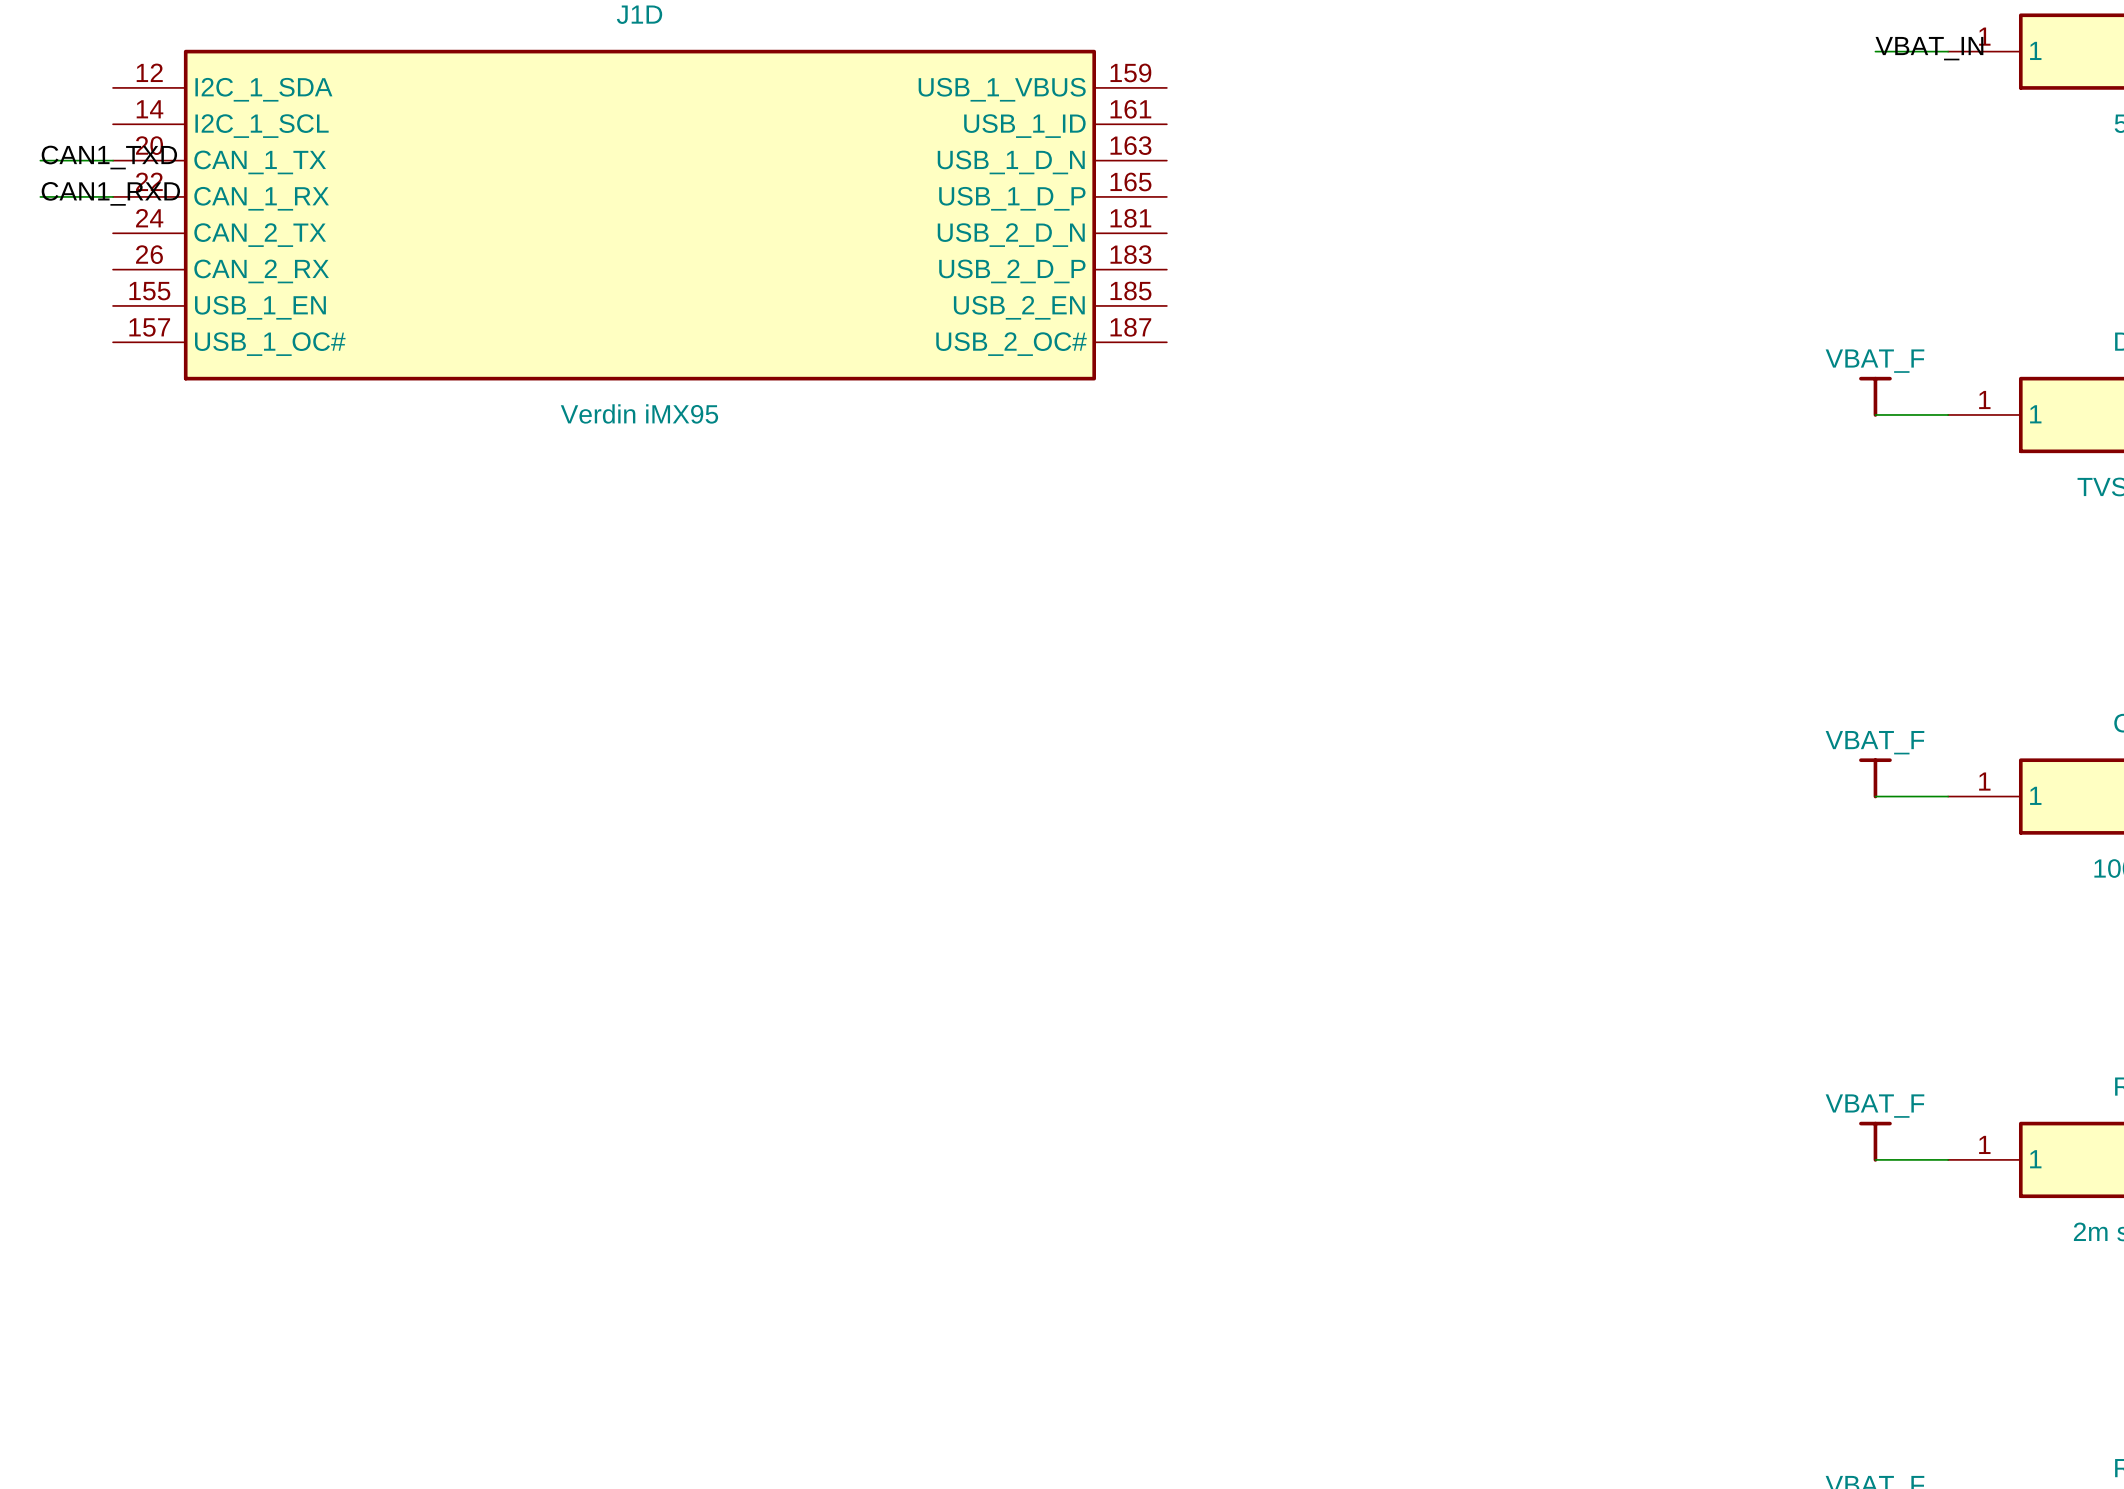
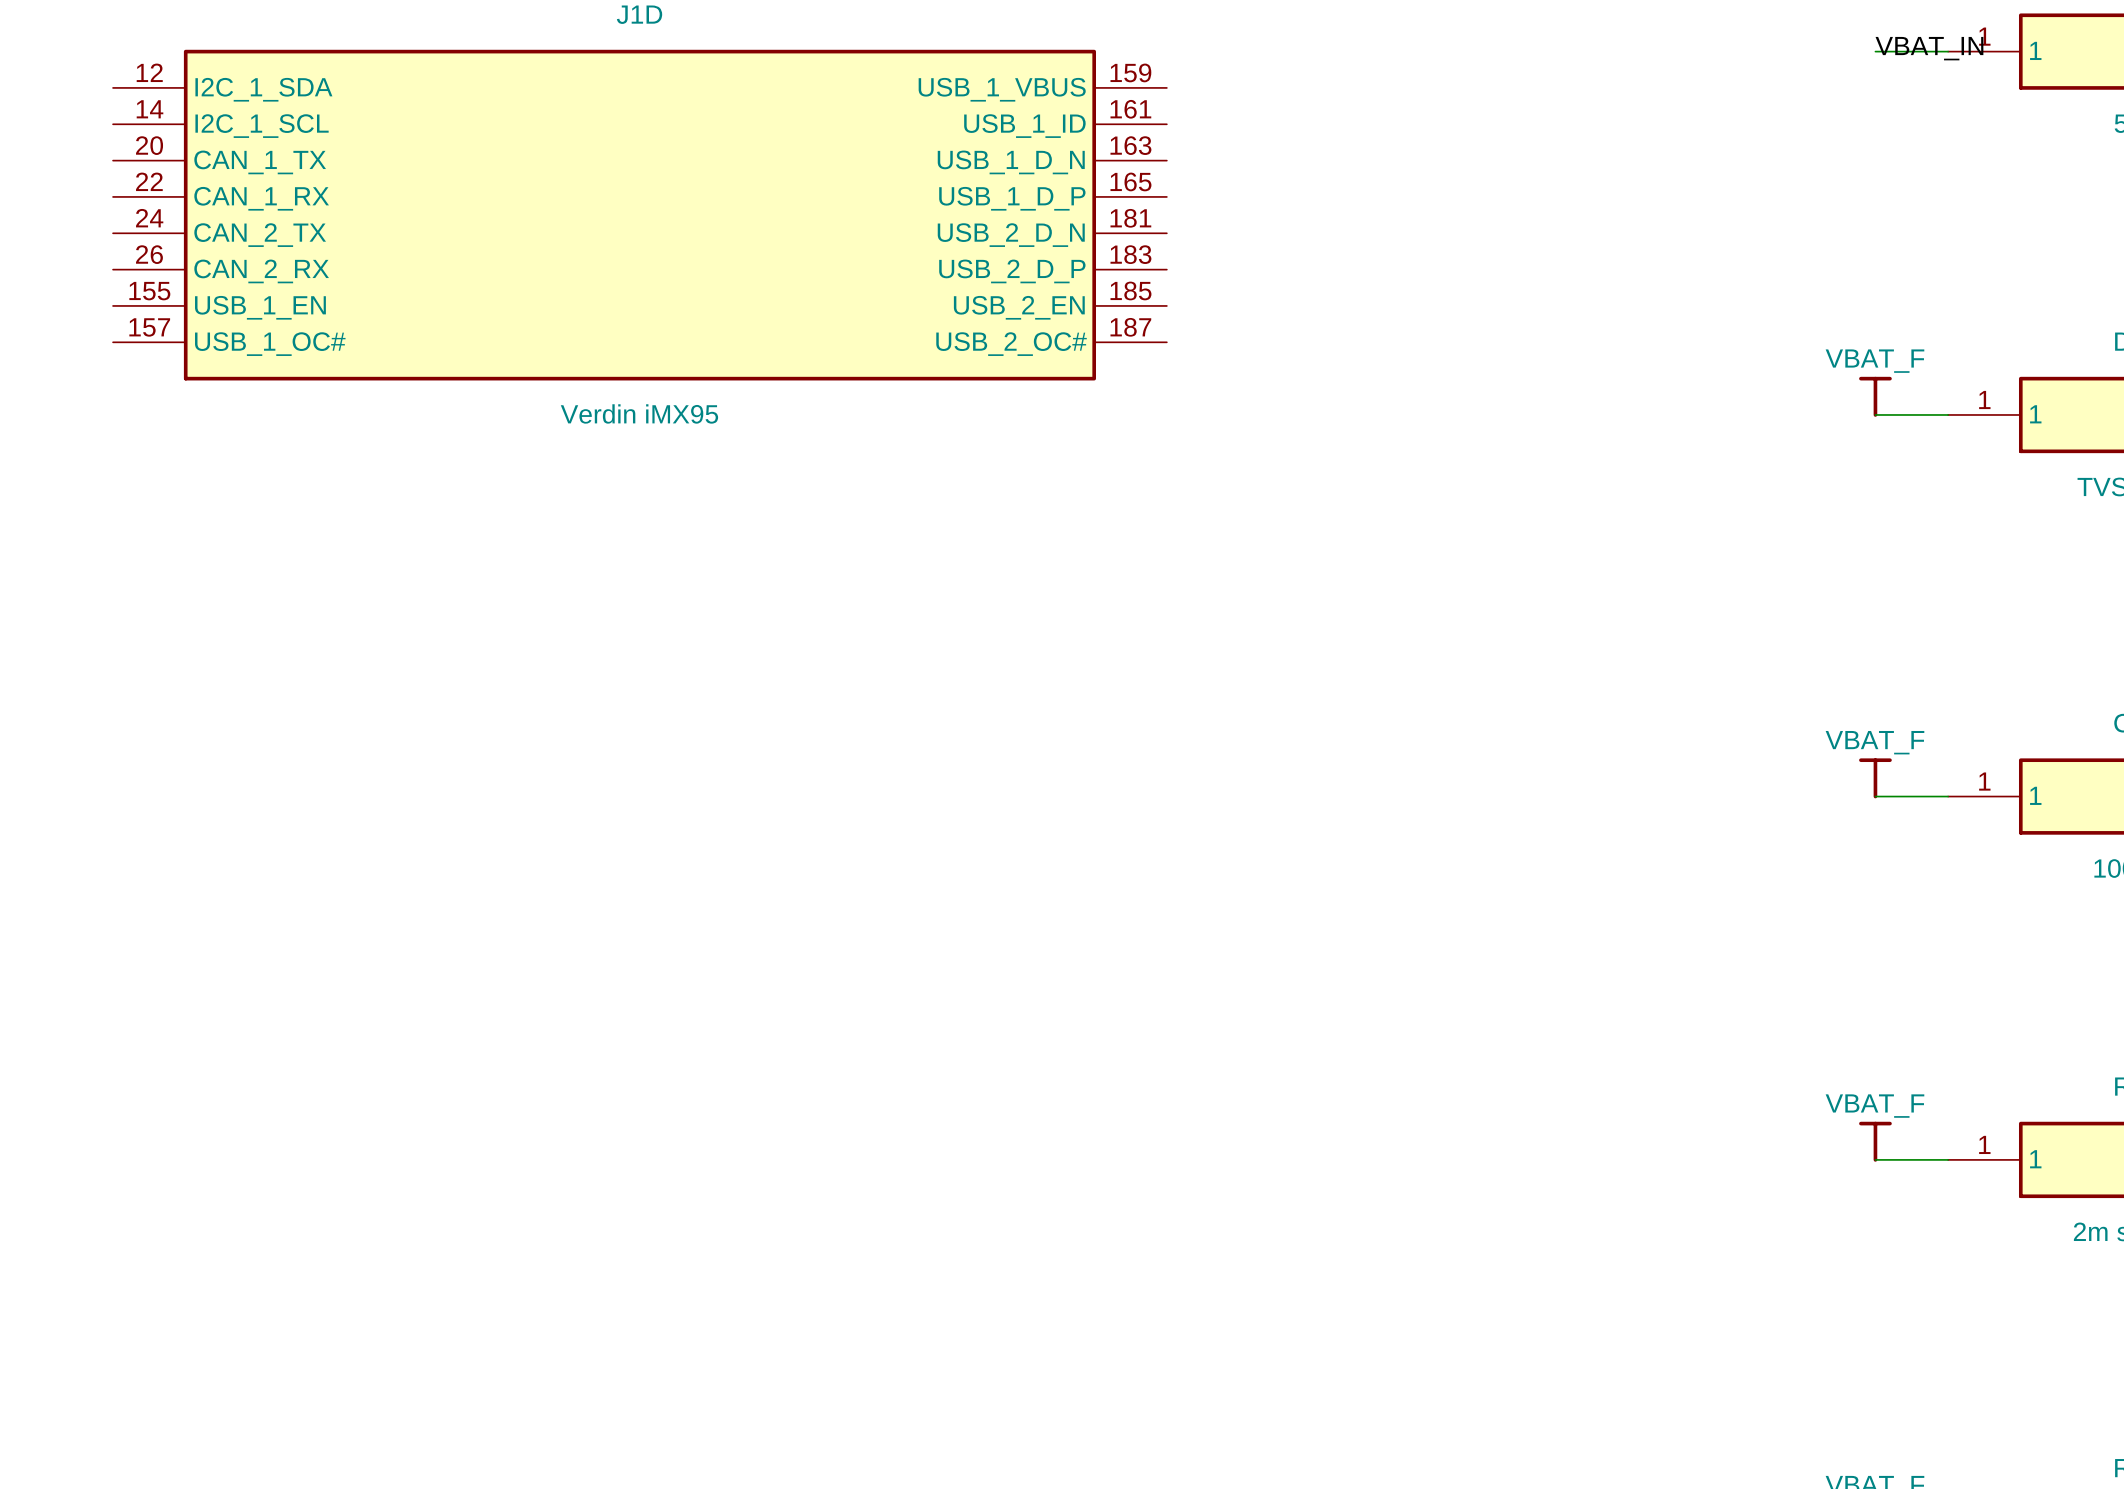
label: CAN1_TXD (109, 157) -> none
wire: (40, 160) (113, 160) -> none
label: CAN1_RXD (110, 193) -> none
wire: (40, 196) (113, 196) -> none

